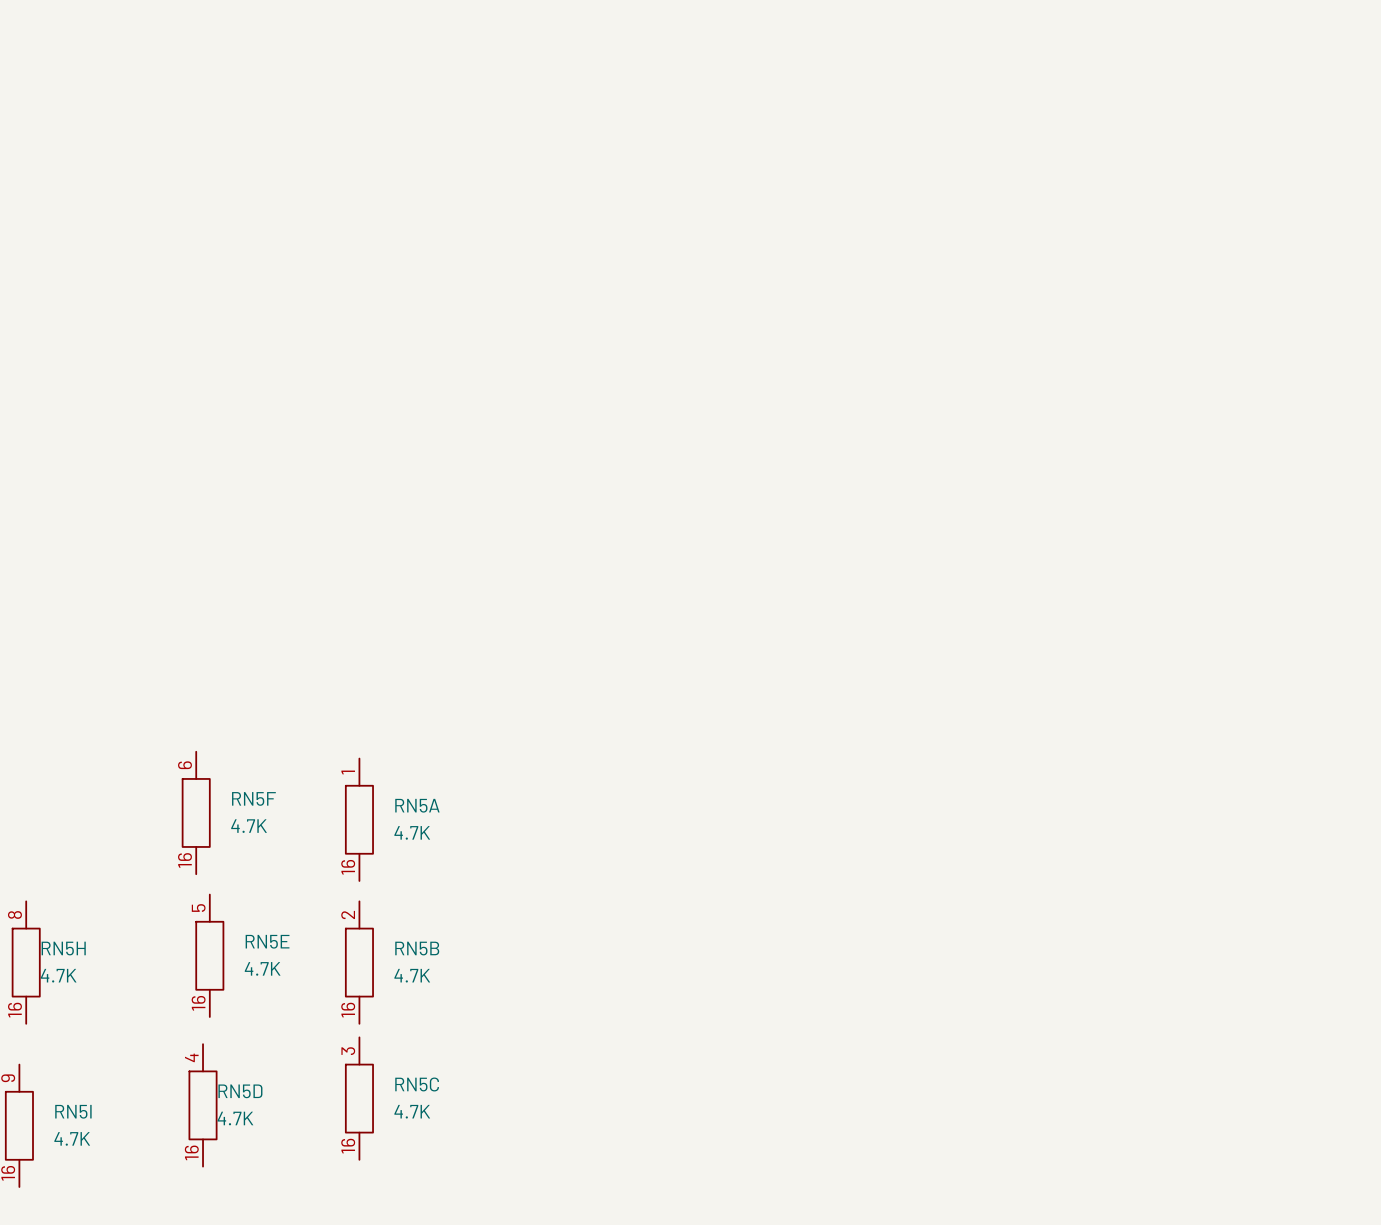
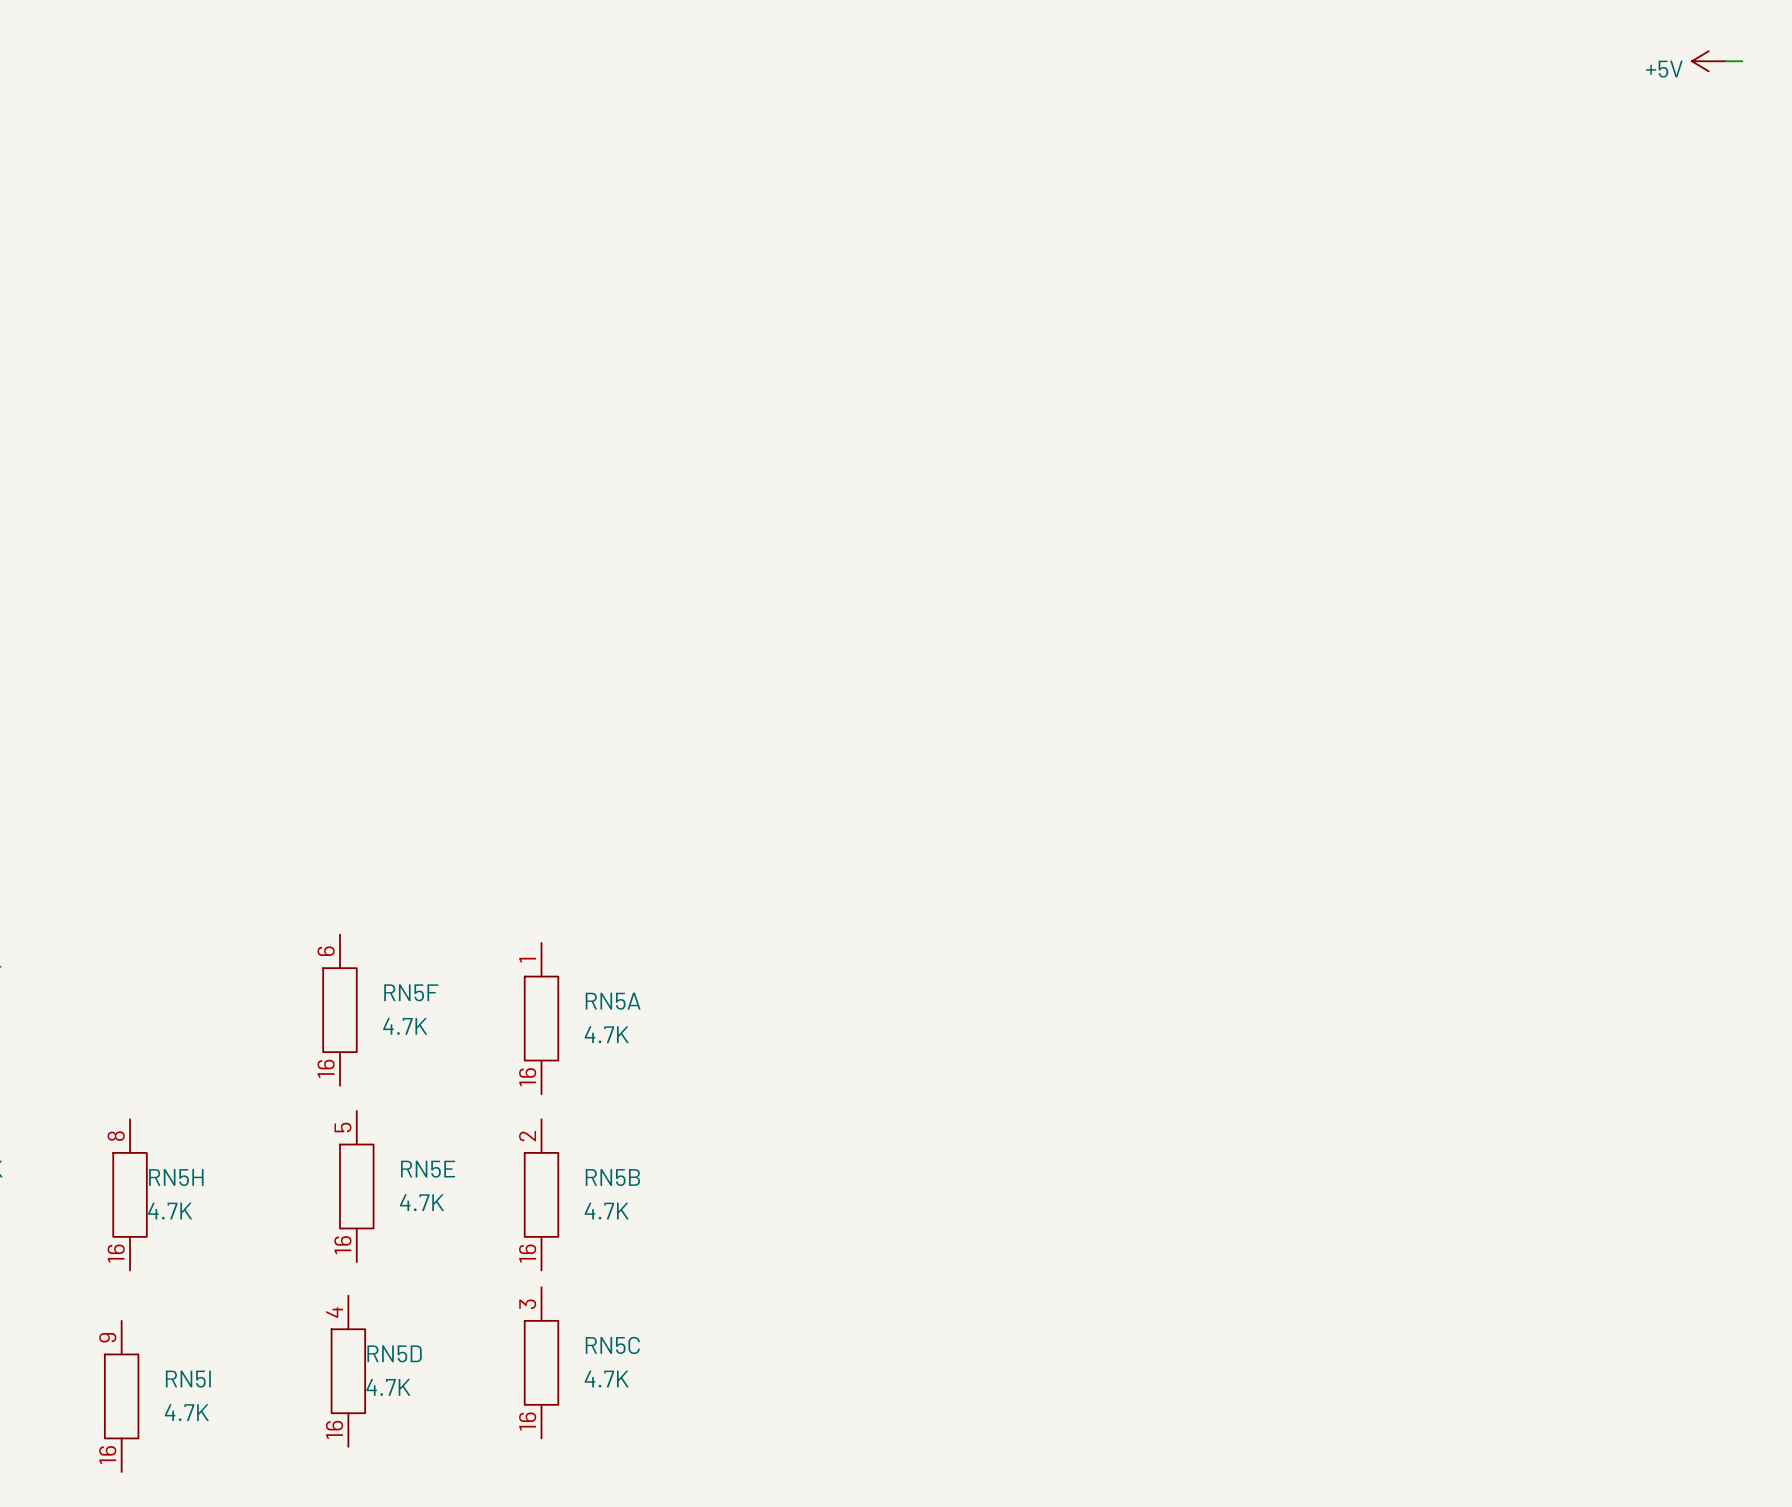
power symbol: none -> +5V (1708, 61)
wire: none -> (1725, 61) (1742, 61)

